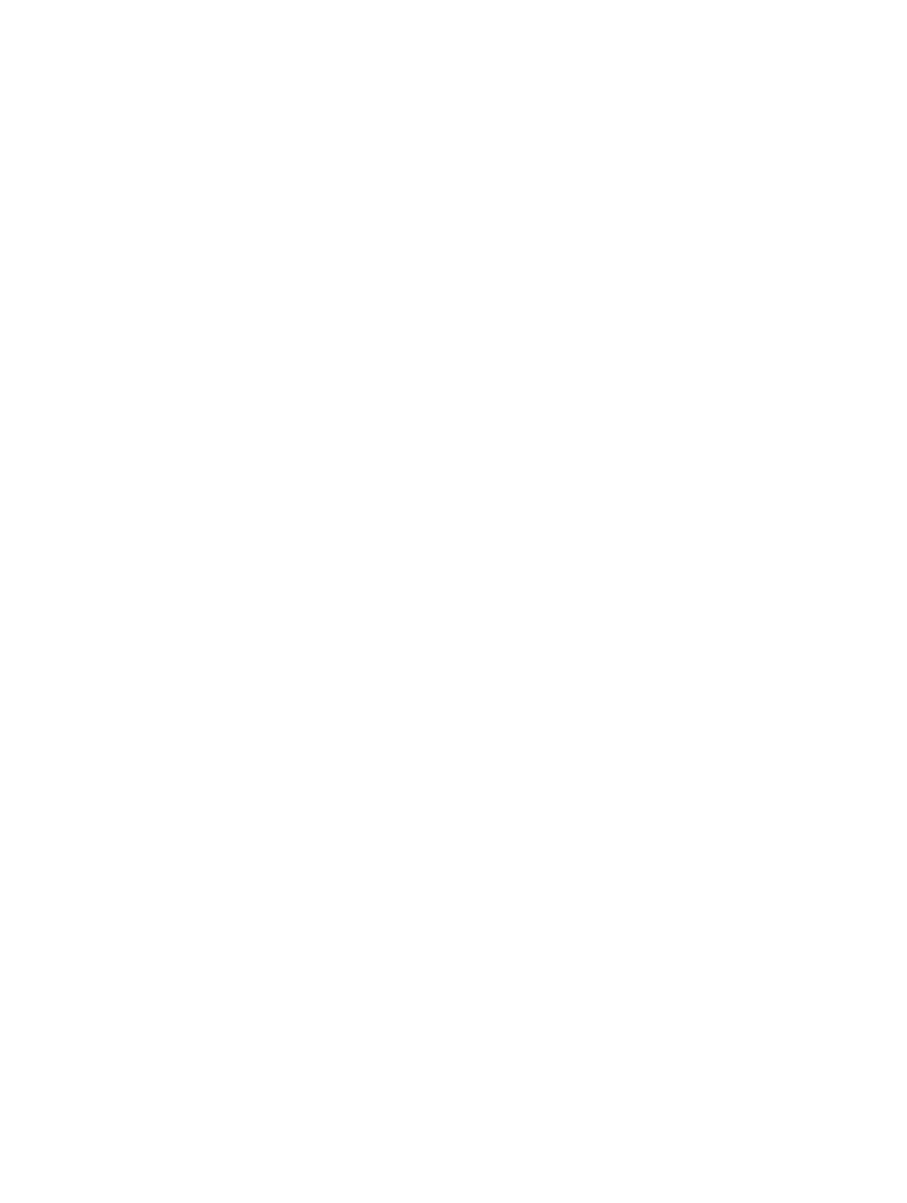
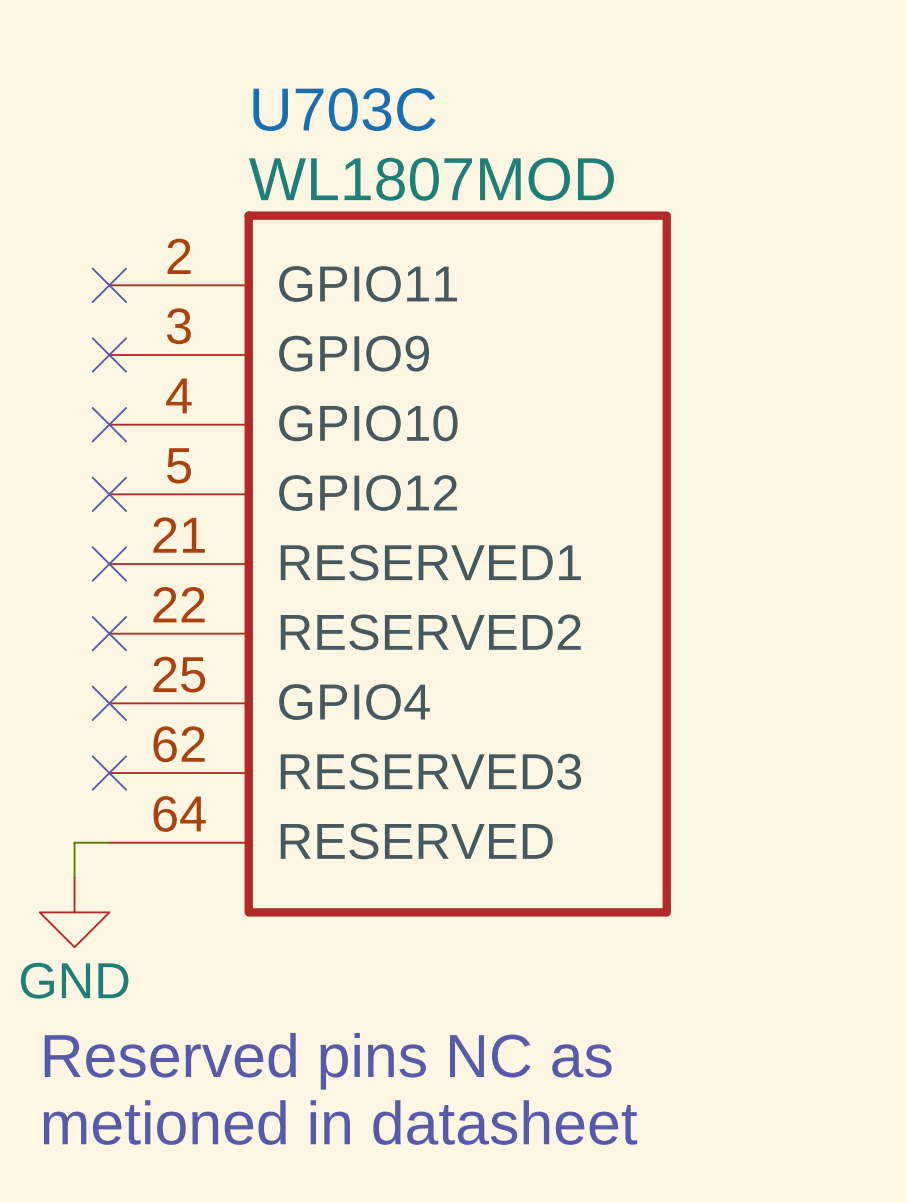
no-connect mark: none -> (109, 285)
no-connect mark: none -> (109, 354)
no-connect mark: none -> (109, 424)
no-connect mark: none -> (109, 494)
no-connect mark: none -> (109, 564)
U703C: none -> WL1807MOD (390, 564)
no-connect mark: none -> (109, 633)
no-connect mark: none -> (109, 703)
no-connect mark: none -> (109, 773)
wire: none -> (109, 842) (74, 842) (74, 877)
power symbol: none -> GND (74, 912)
text: none -> Reserved pins NC as (328, 1061)
text: none -> metioned in datasheet (340, 1122)

